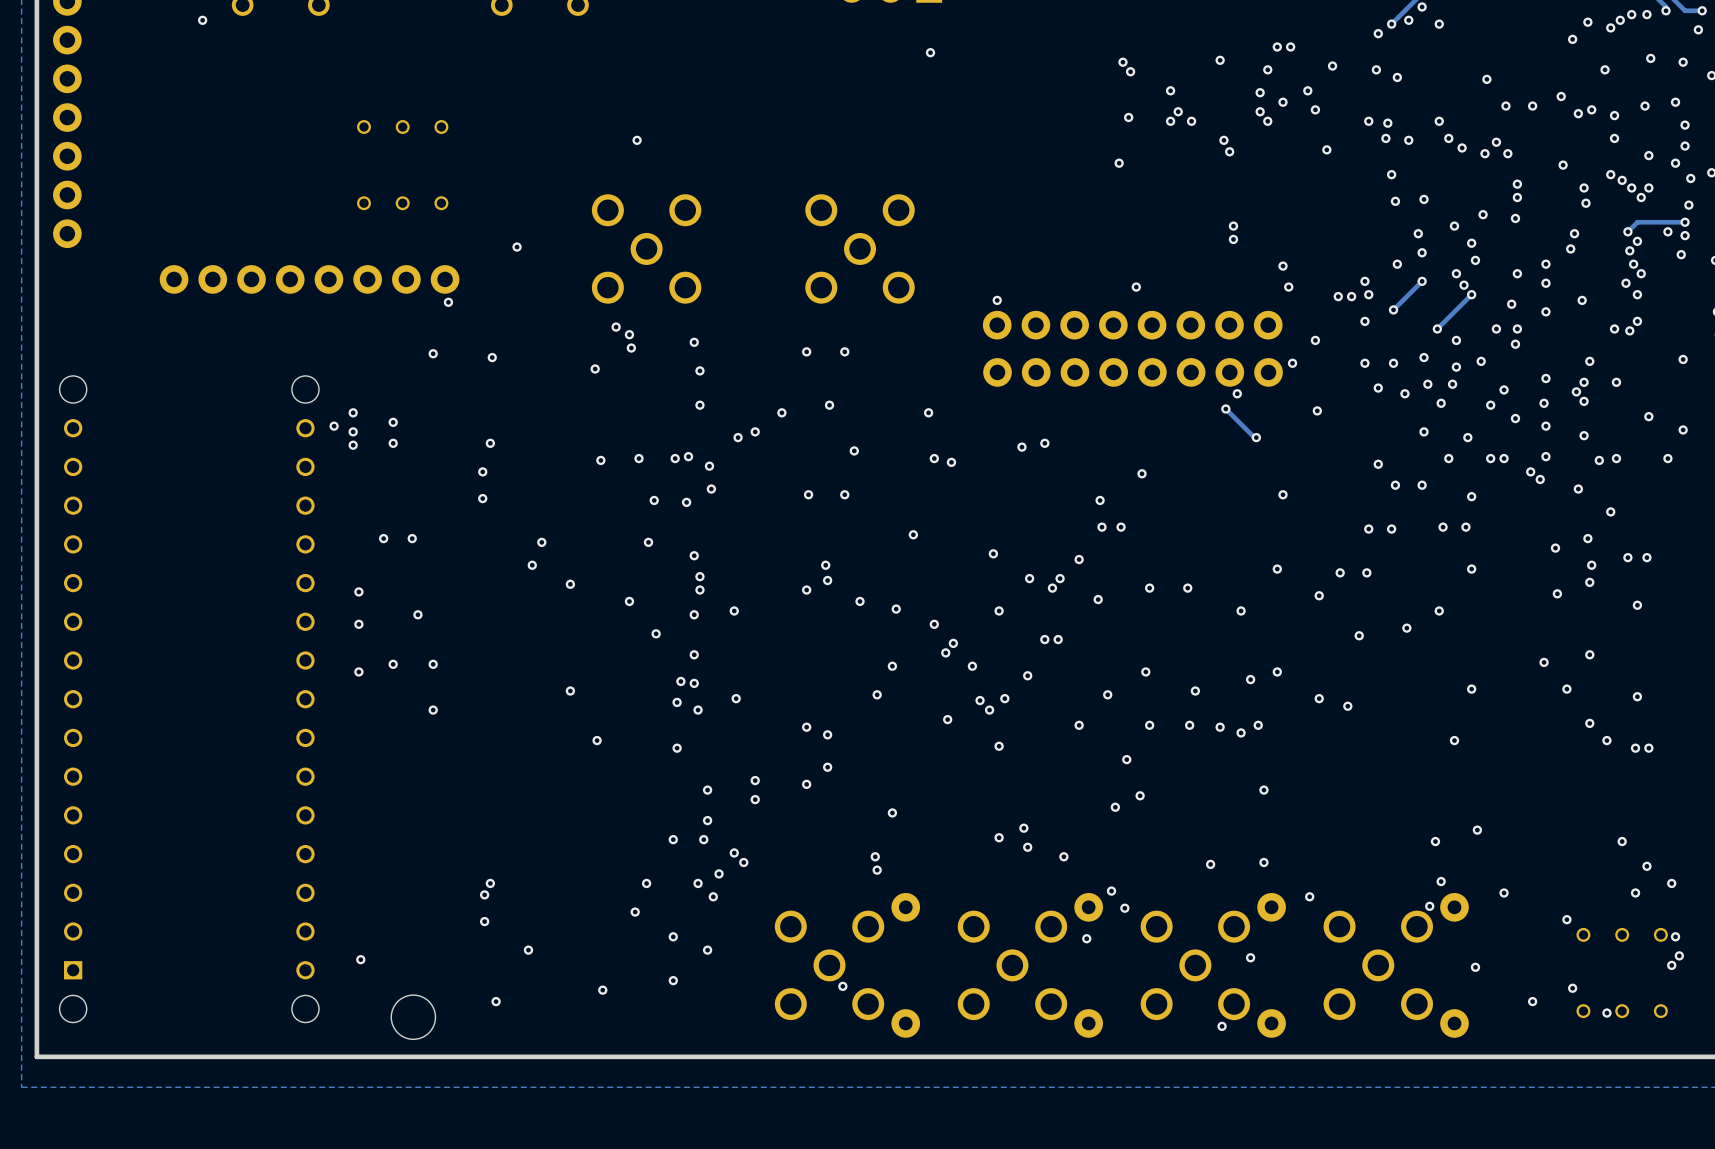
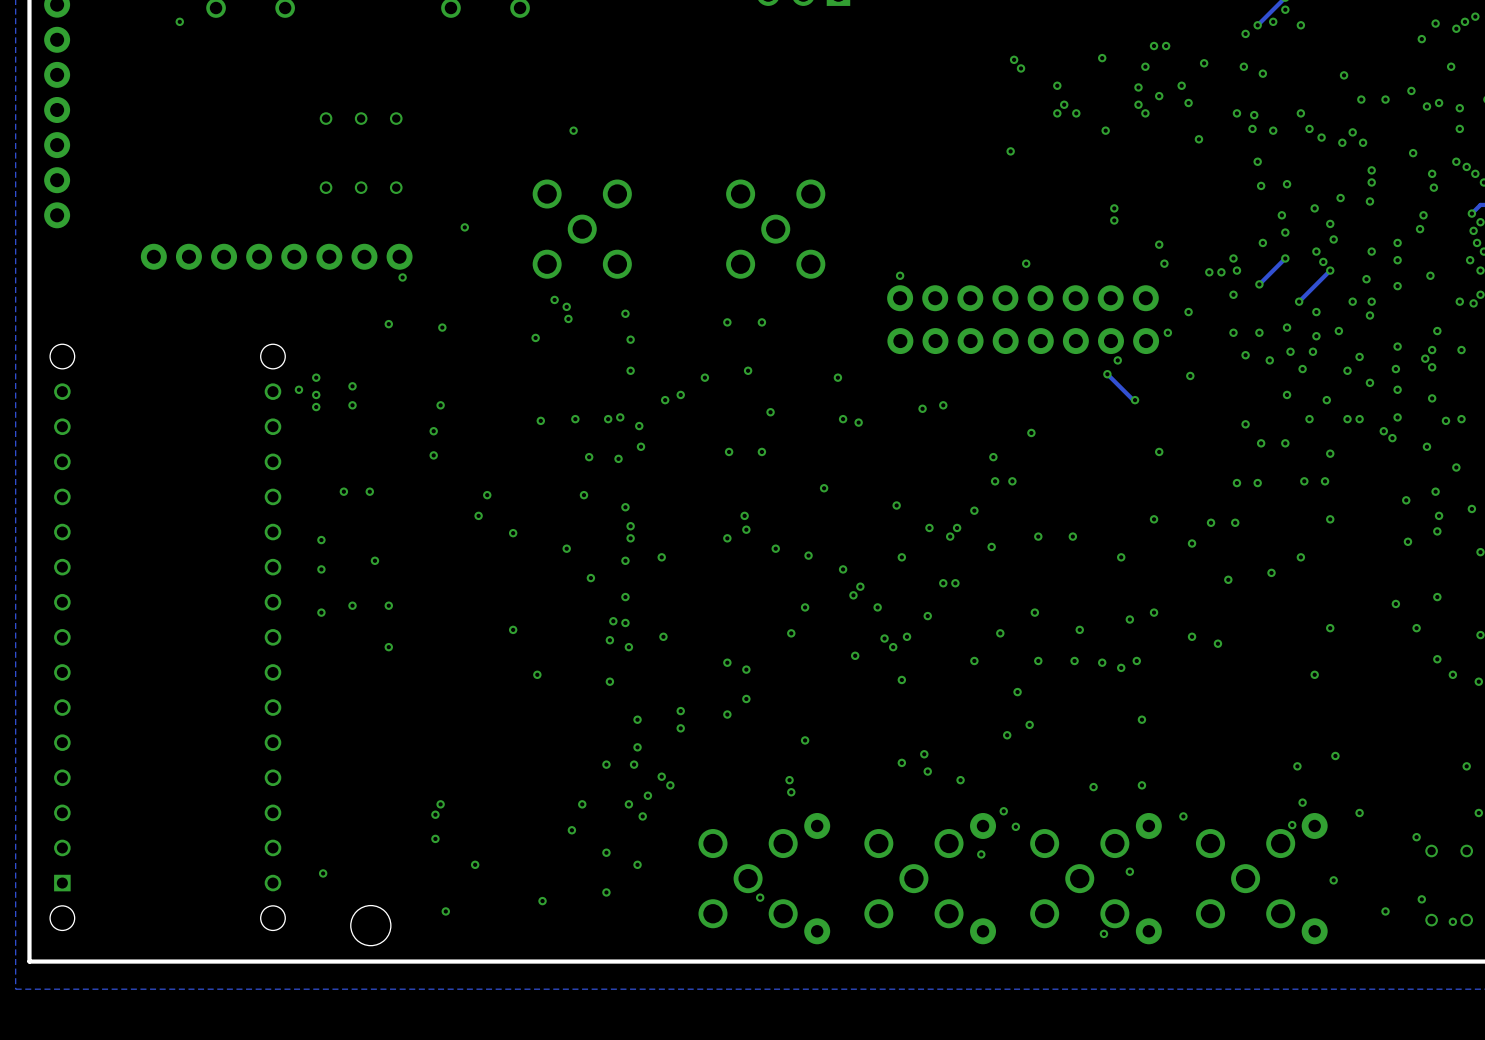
via: (930, 52) -> none
via: (1128, 117) -> none
via: (1229, 151) -> none

